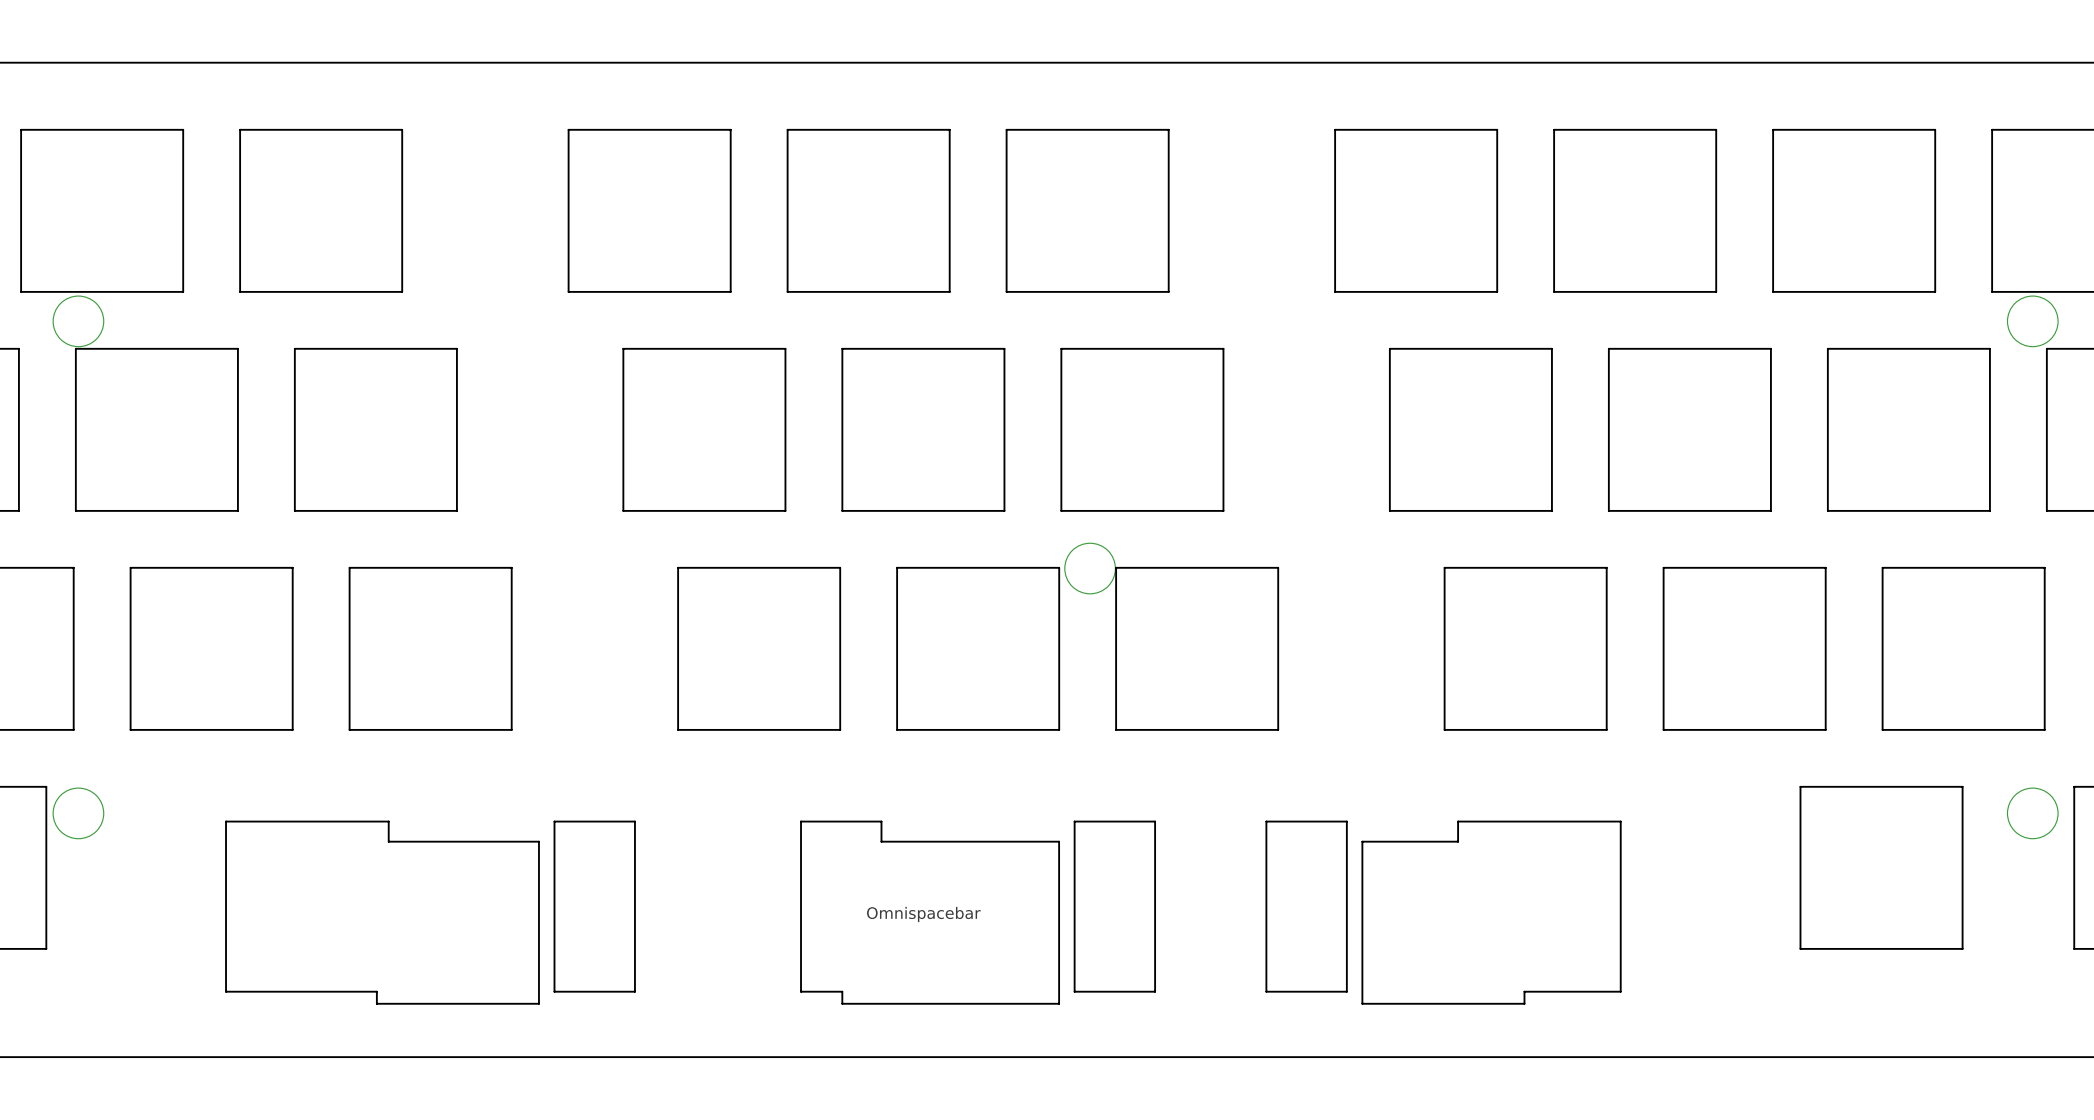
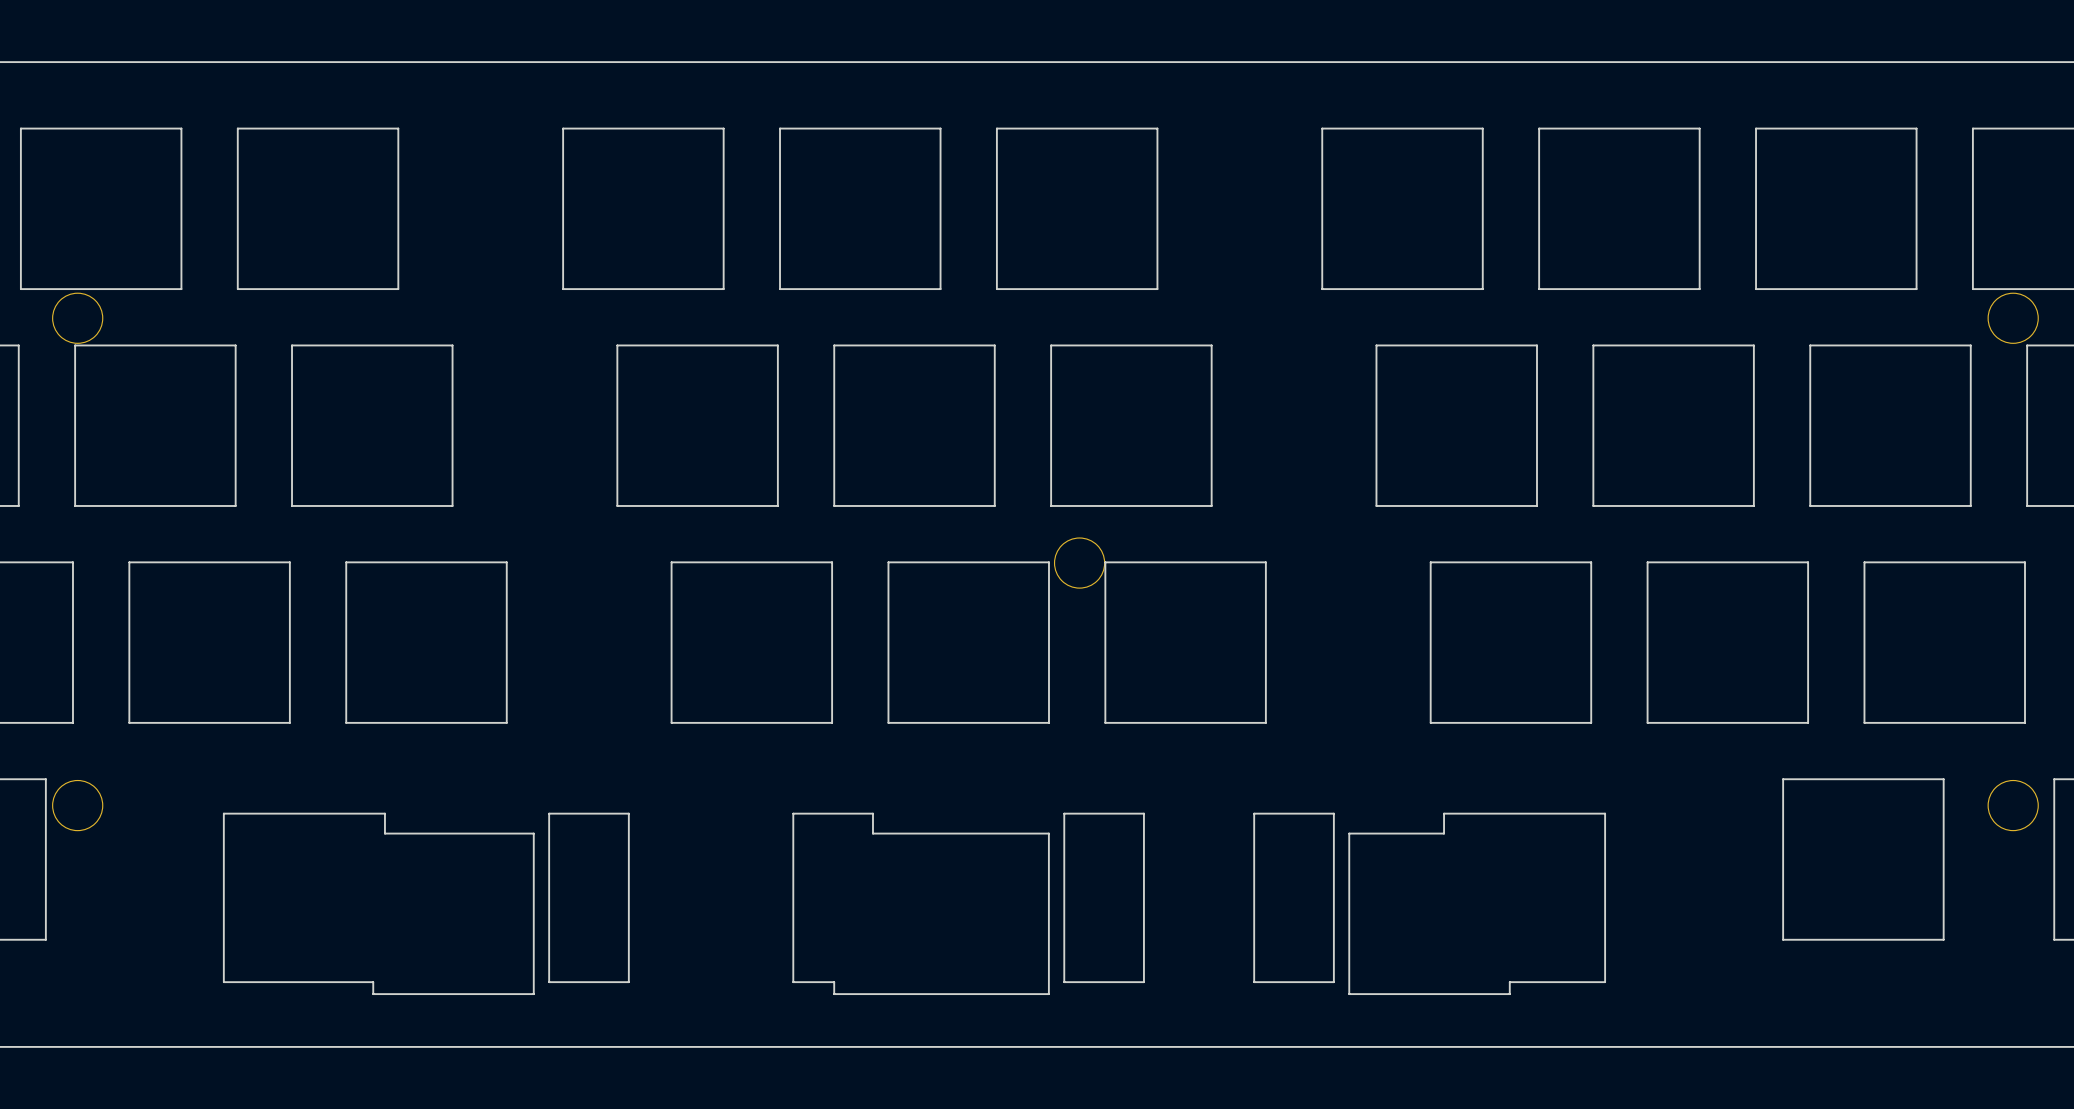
Omnispacebar: (923, 912) -> none

